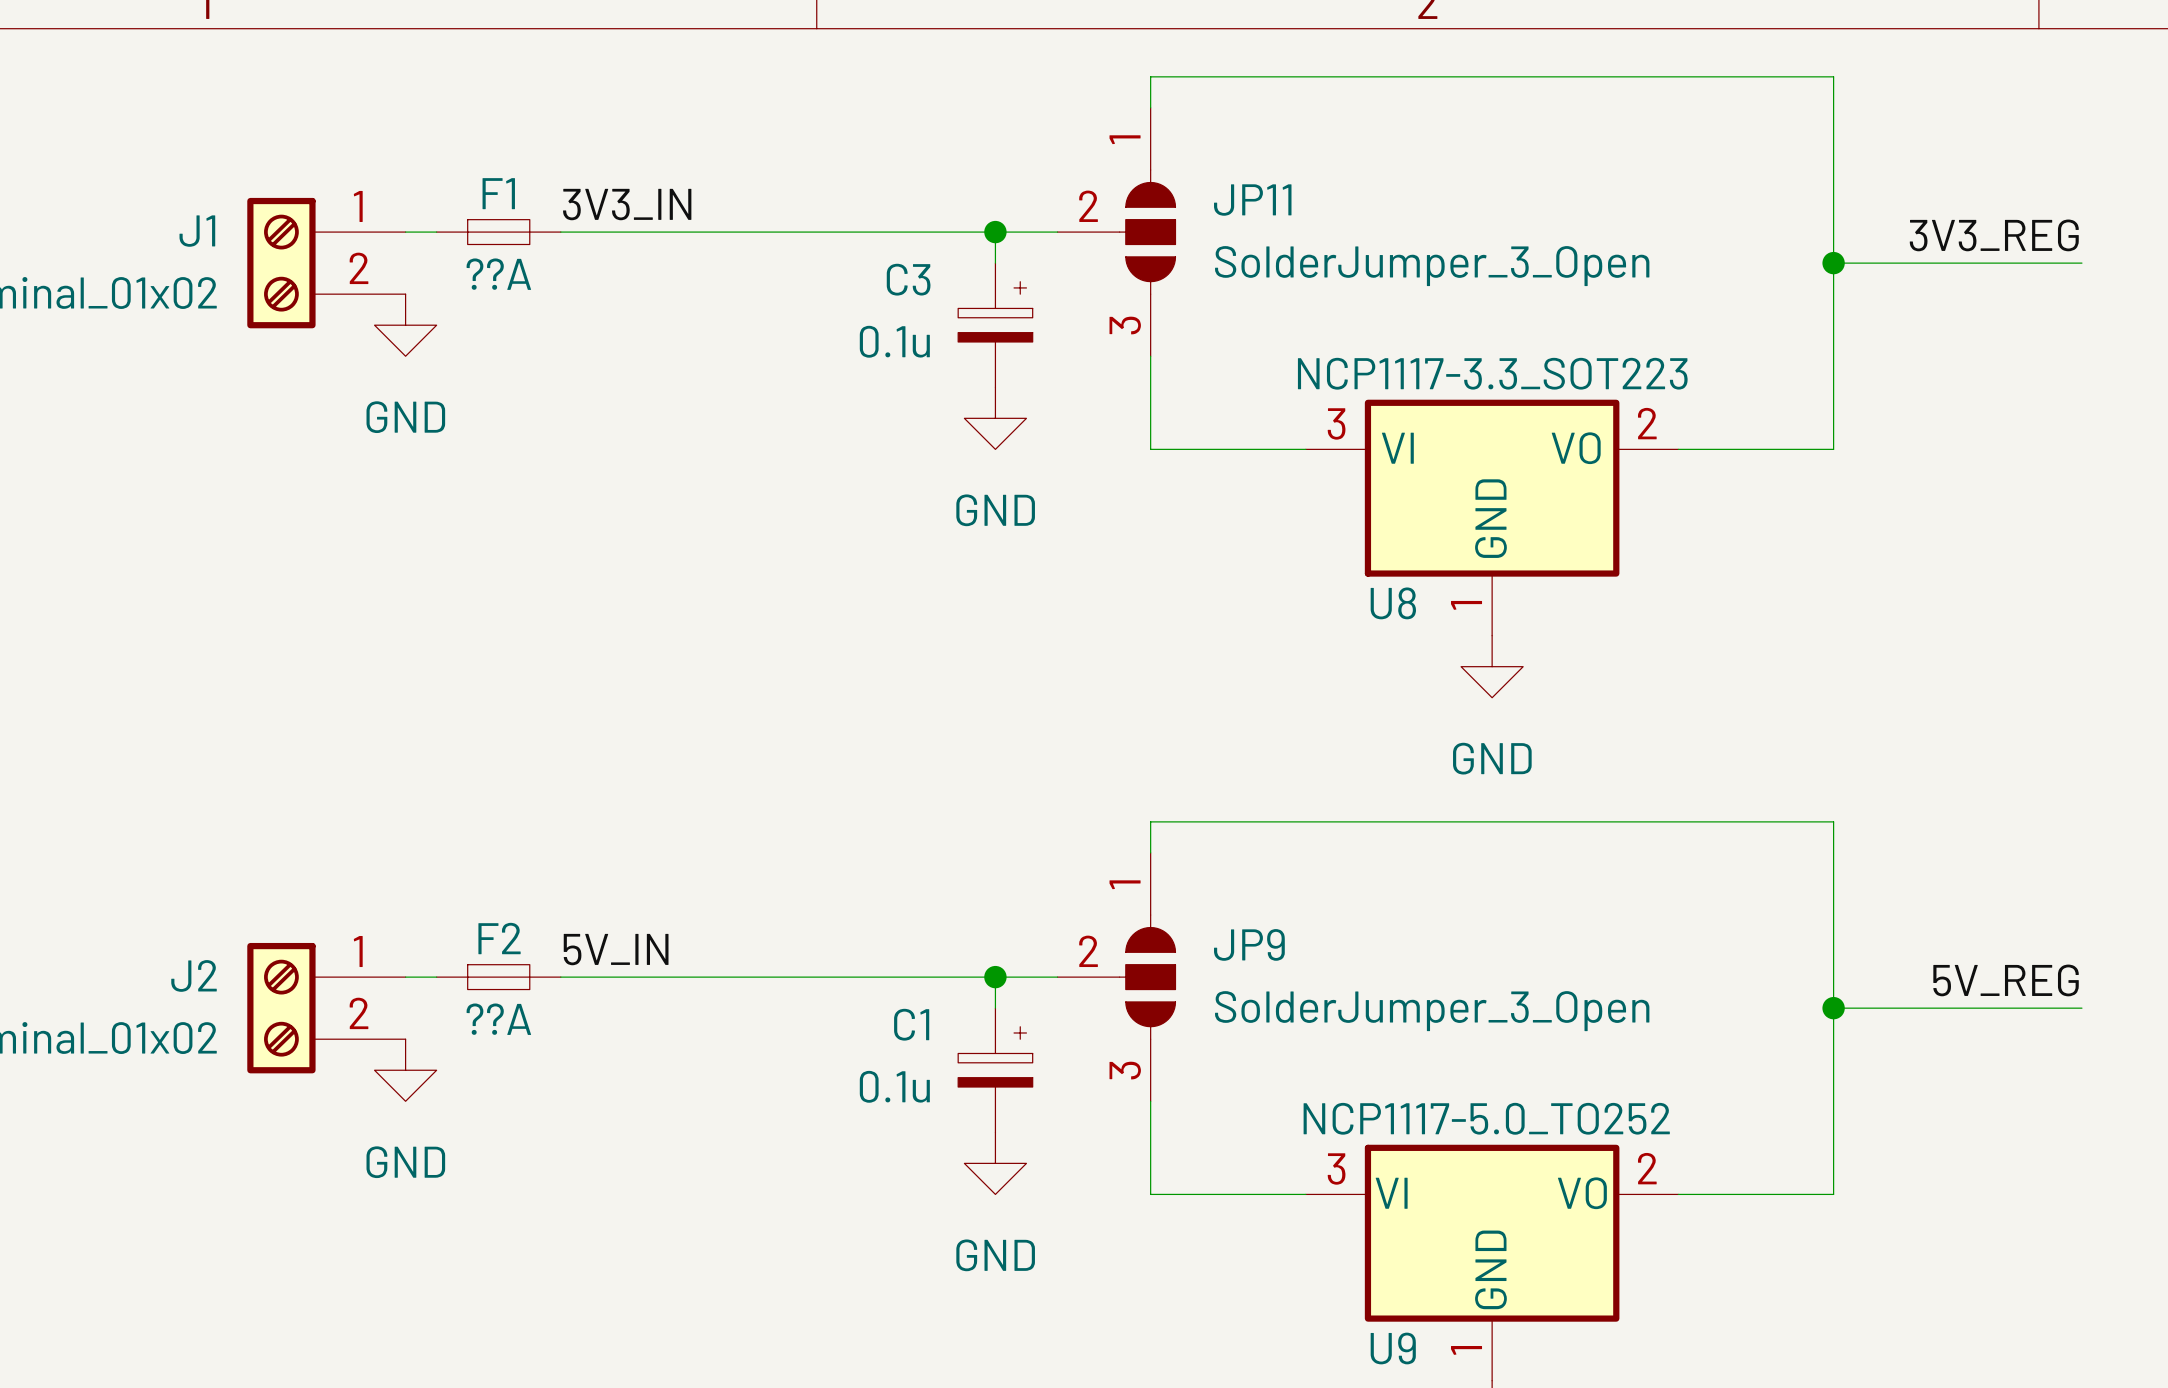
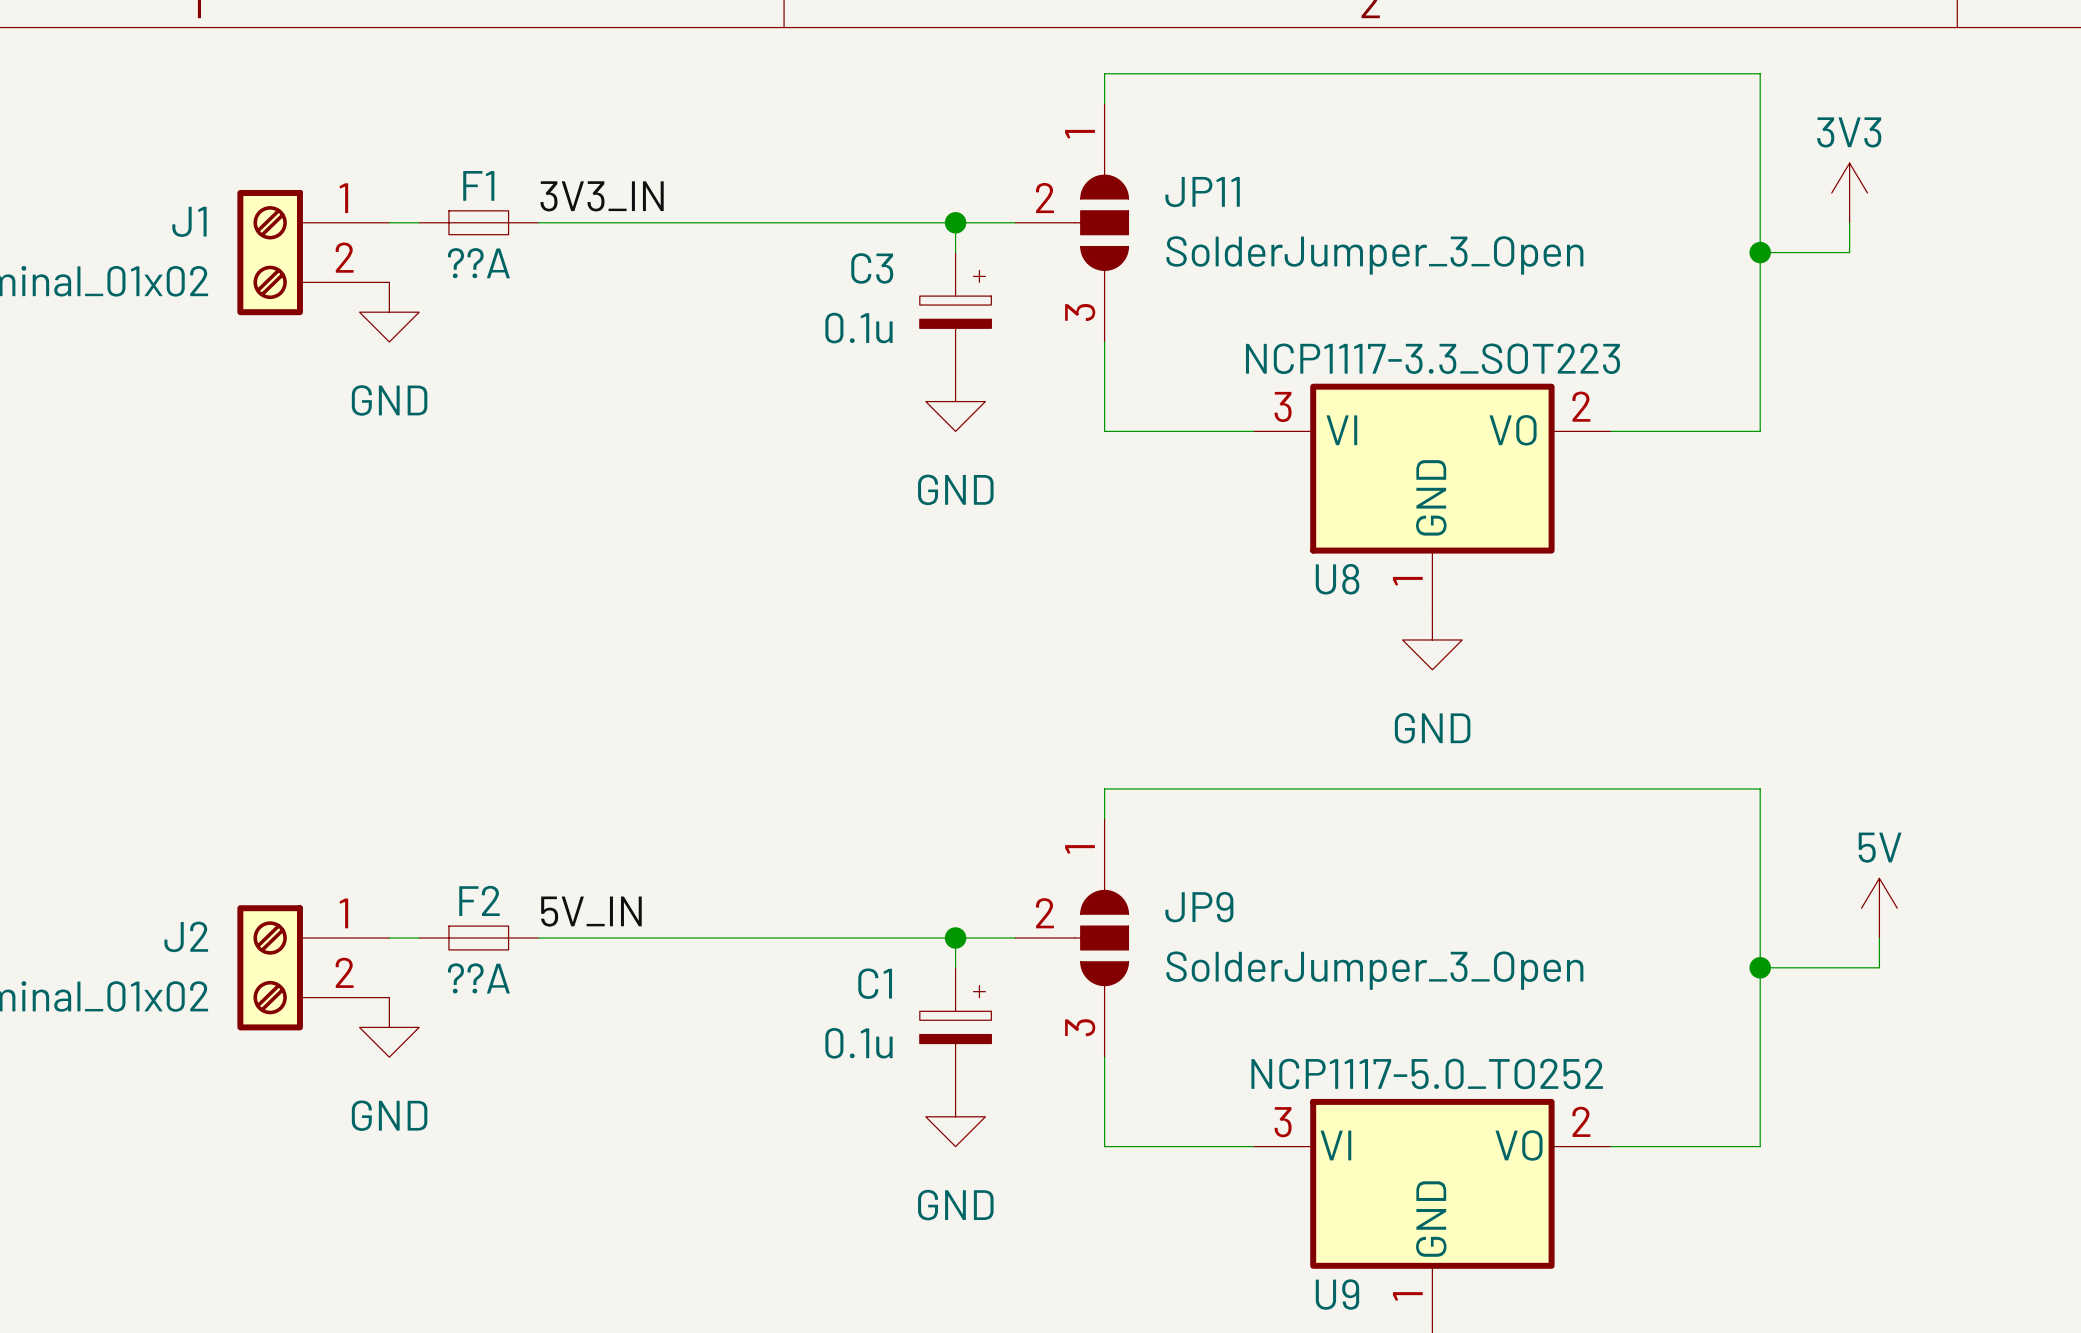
power symbol: none -> 3V3 (1849, 192)
label: 3V3_REG (1994, 235) -> none
wire: (1926, 263) (2081, 263) -> (1849, 252) (1849, 222)
power symbol: none -> 5V (1879, 908)
label: 5V_REG (2006, 980) -> none
wire: (1957, 1008) (2081, 1008) -> (1879, 967) (1879, 938)

